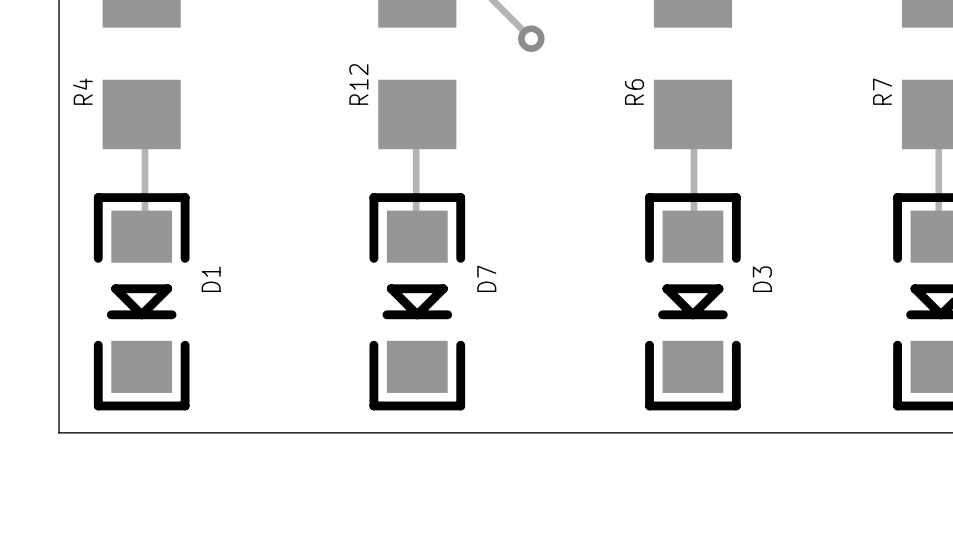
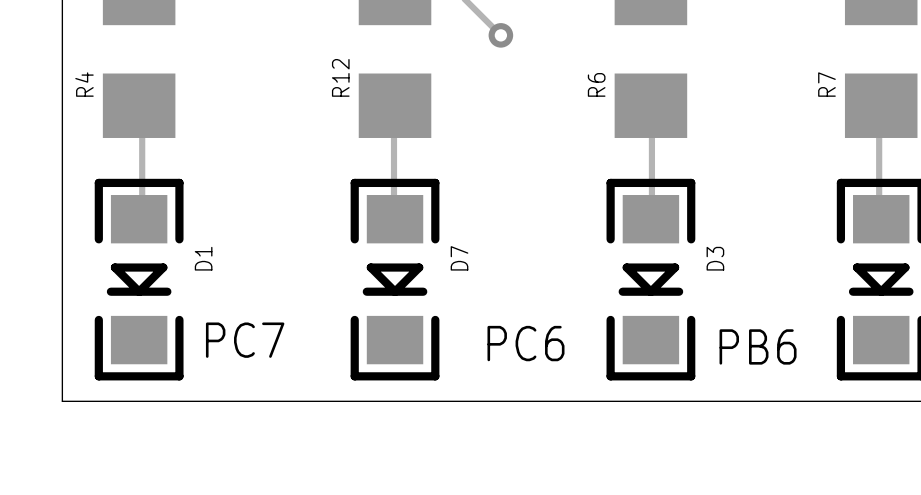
text: none -> PC7 (245, 340)
text: none -> PC6 (525, 343)
text: none -> PB6 (758, 346)

